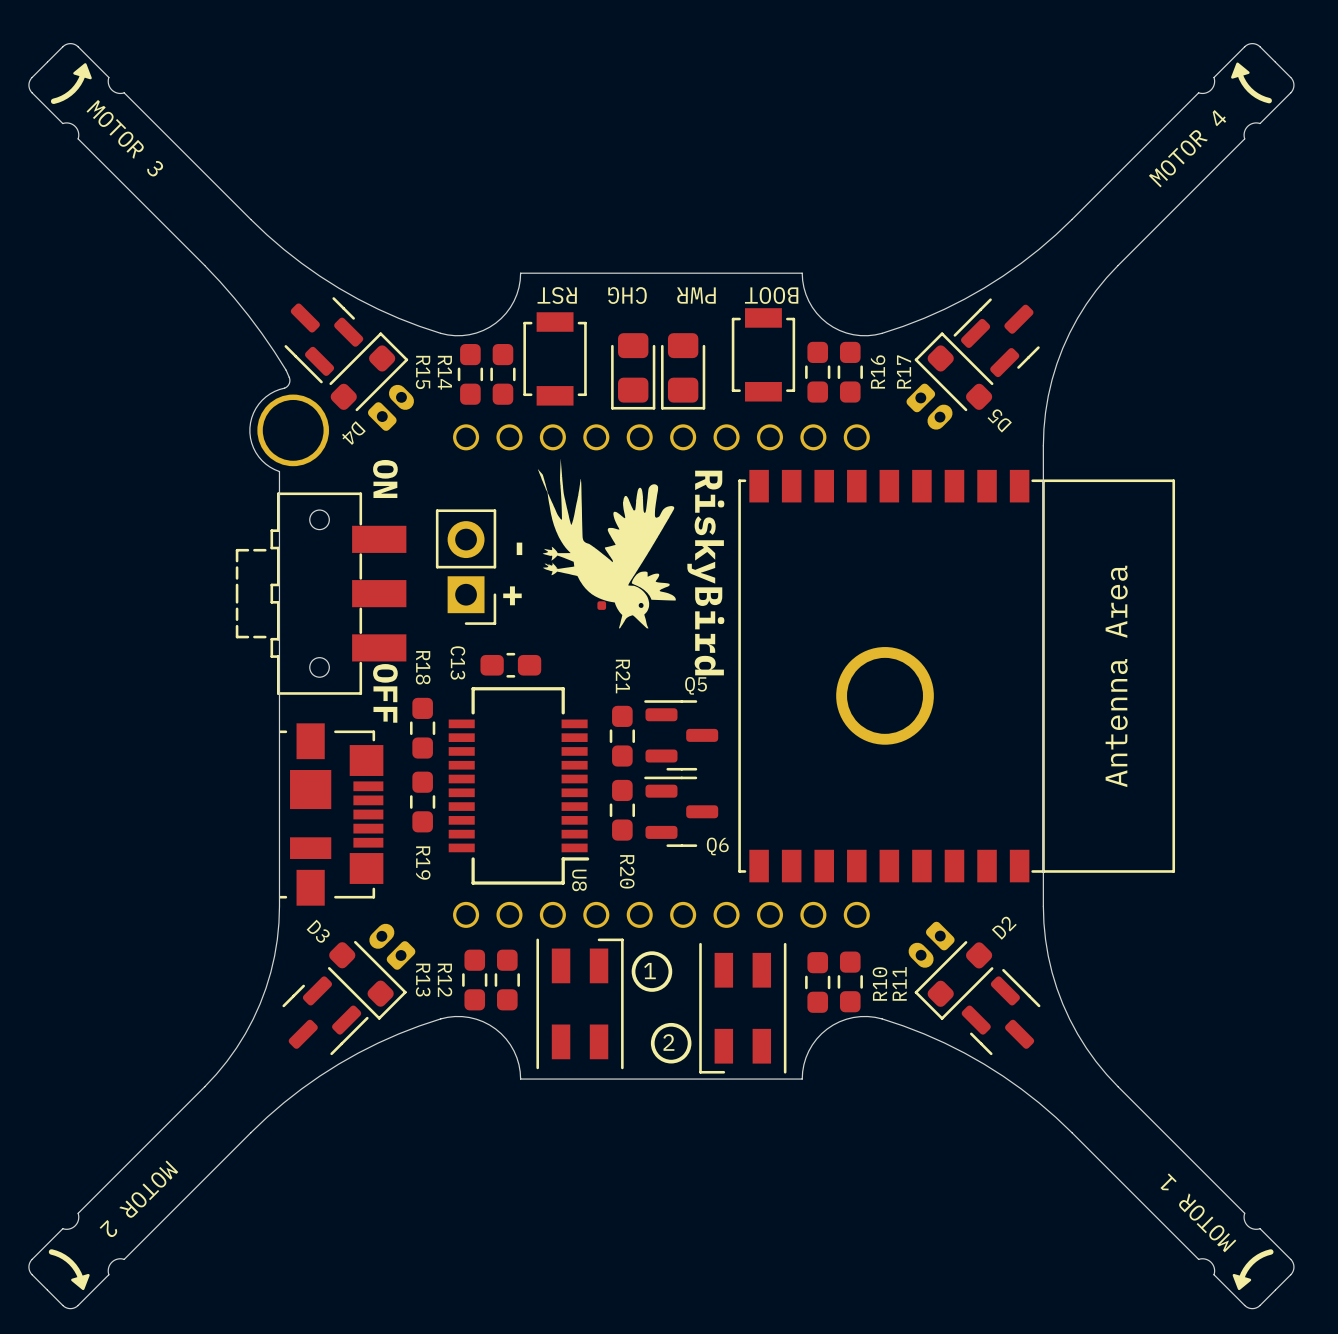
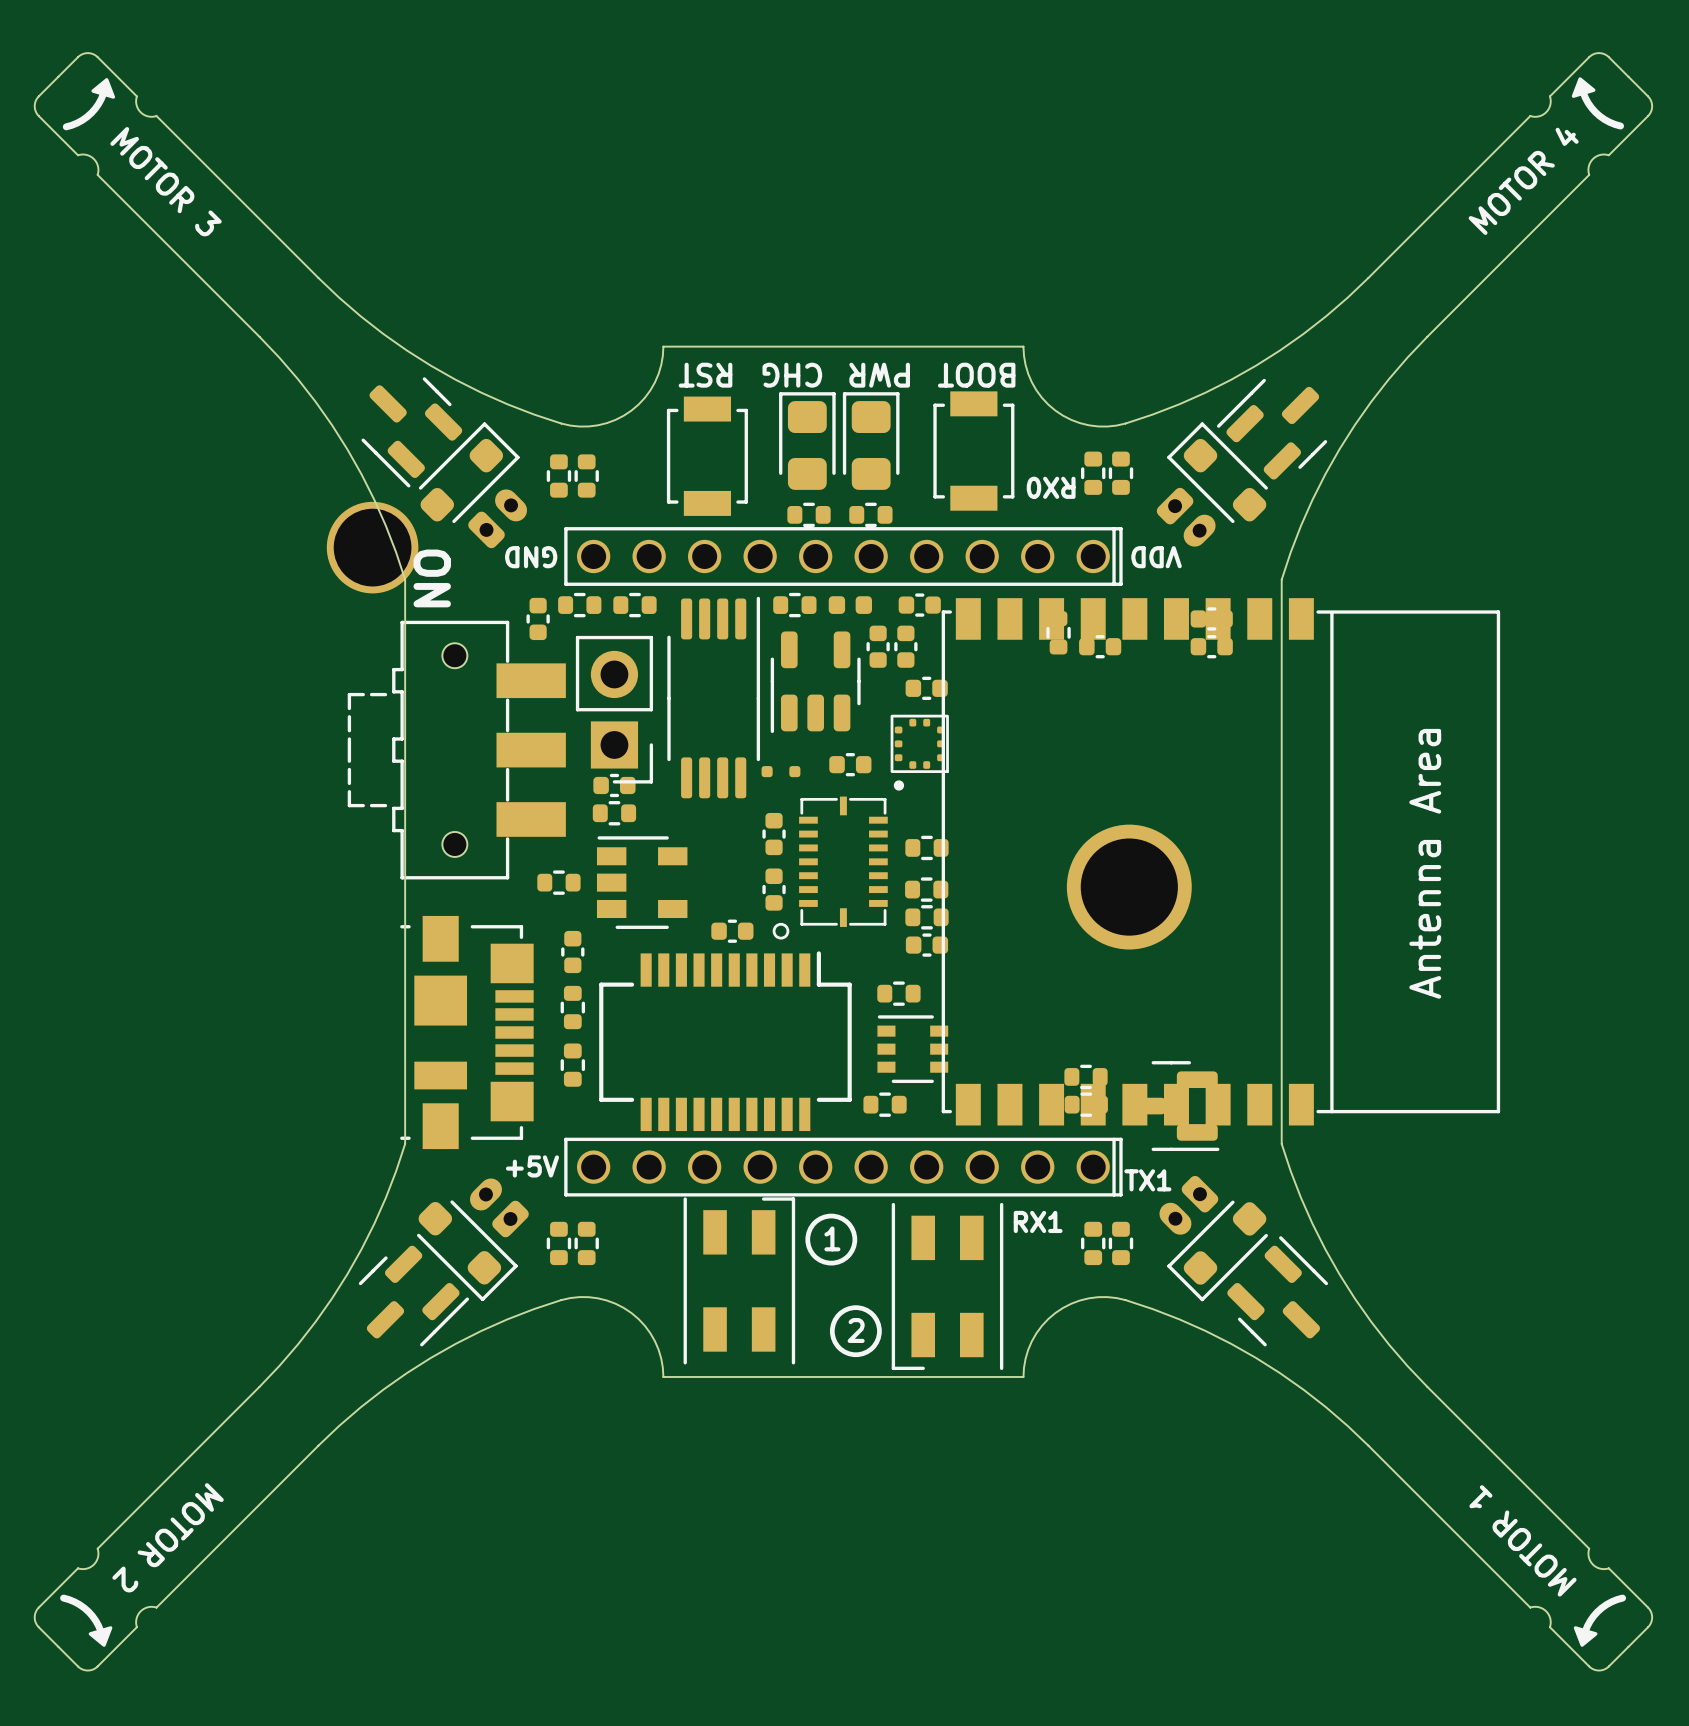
drawing shape: [28, 43, 1295, 1310] -> [34, 52, 1653, 1672]
part rotation: 0° (633, 371) -> 180° (807, 441)
part rotation: 0° (683, 371) -> 180° (871, 441)
R16: (817, 372) -> none
R17: (850, 372) -> none
part: none -> (1093, 473)
part: none -> (1120, 473)
part: none -> (558, 476)
part: none -> (586, 476)
R15: (470, 374) -> none
R14: (502, 374) -> none
text: none -> RX0 (1051, 487)
part: none -> (809, 514)
part: none -> (870, 514)
line: none -> (565, 528) (565, 584) (1120, 584) (1120, 528) (565, 528)
line: none -> (1114, 528) (1114, 584)
D5 name: D5 (999, 420) -> none
D4 name: D4 (353, 433) -> none
text: none -> GND (531, 557)
text: none -> VDD (1156, 557)
drawing: [537, 458, 676, 629] -> none
part: none -> (579, 605)
part: none -> (634, 605)
part: none -> (794, 605)
part: none -> (850, 605)
part: none -> (919, 605)
text position: ON (385, 478) -> ON (432, 578)
part: none -> (538, 618)
part: none -> (1211, 618)
part: none -> (1058, 632)
part: none -> (878, 646)
part: none -> (905, 646)
part: none -> (1100, 646)
part: none -> (1211, 646)
part: none -> (815, 682)
part: none -> (926, 688)
part: none -> (713, 697)
text: - (519, 548) -> none
part position: (466, 567) -> (614, 709)
text: RiskyBird (705, 573) -> none
part: none -> (919, 752)
part position: (321, 593) -> (456, 750)
text: + (512, 595) -> none
part: none -> (850, 764)
part: none -> (614, 785)
part: none -> (614, 813)
part: none -> (774, 834)
C13: (510, 665) -> none
part: none -> (926, 847)
part: none -> (830, 868)
part: none -> (558, 882)
part: none -> (642, 882)
text: OFF (385, 693) -> none
part: none -> (774, 889)
part: none -> (926, 889)
part: none -> (926, 917)
R18: (422, 728) -> none
part: none -> (732, 931)
Q5: (681, 735) -> none
R21: (622, 736) -> none
part: none -> (926, 945)
part: none -> (572, 952)
part: none -> (898, 993)
U8: (518, 785) -> none
part: none -> (572, 1007)
R19: (422, 802) -> none
R20: (622, 810) -> none
Q6: (681, 811) -> none
part position: (331, 814) -> (466, 1032)
part: none -> (725, 1041)
part: none -> (912, 1049)
part: none -> (572, 1065)
part: none -> (1086, 1076)
part: none -> (885, 1104)
part: none -> (1086, 1104)
part: none -> (1172, 1106)
line: none -> (565, 1139) (1120, 1139) (1120, 1194) (565, 1194) (565, 1139)
line: none -> (1114, 1139) (1114, 1194)
text: none -> +5V (532, 1166)
text: none -> TX1 (1147, 1180)
D2 name: D2 (1004, 928) -> none
D3 name: D3 (318, 931) -> none
text: none -> RX1 (1038, 1221)
part: none -> (558, 1243)
part: none -> (586, 1243)
part: none -> (1093, 1243)
part: none -> (1120, 1243)
R13: (474, 980) -> none
R12: (507, 980) -> none
R11: (850, 981) -> none
R10: (817, 982) -> none

